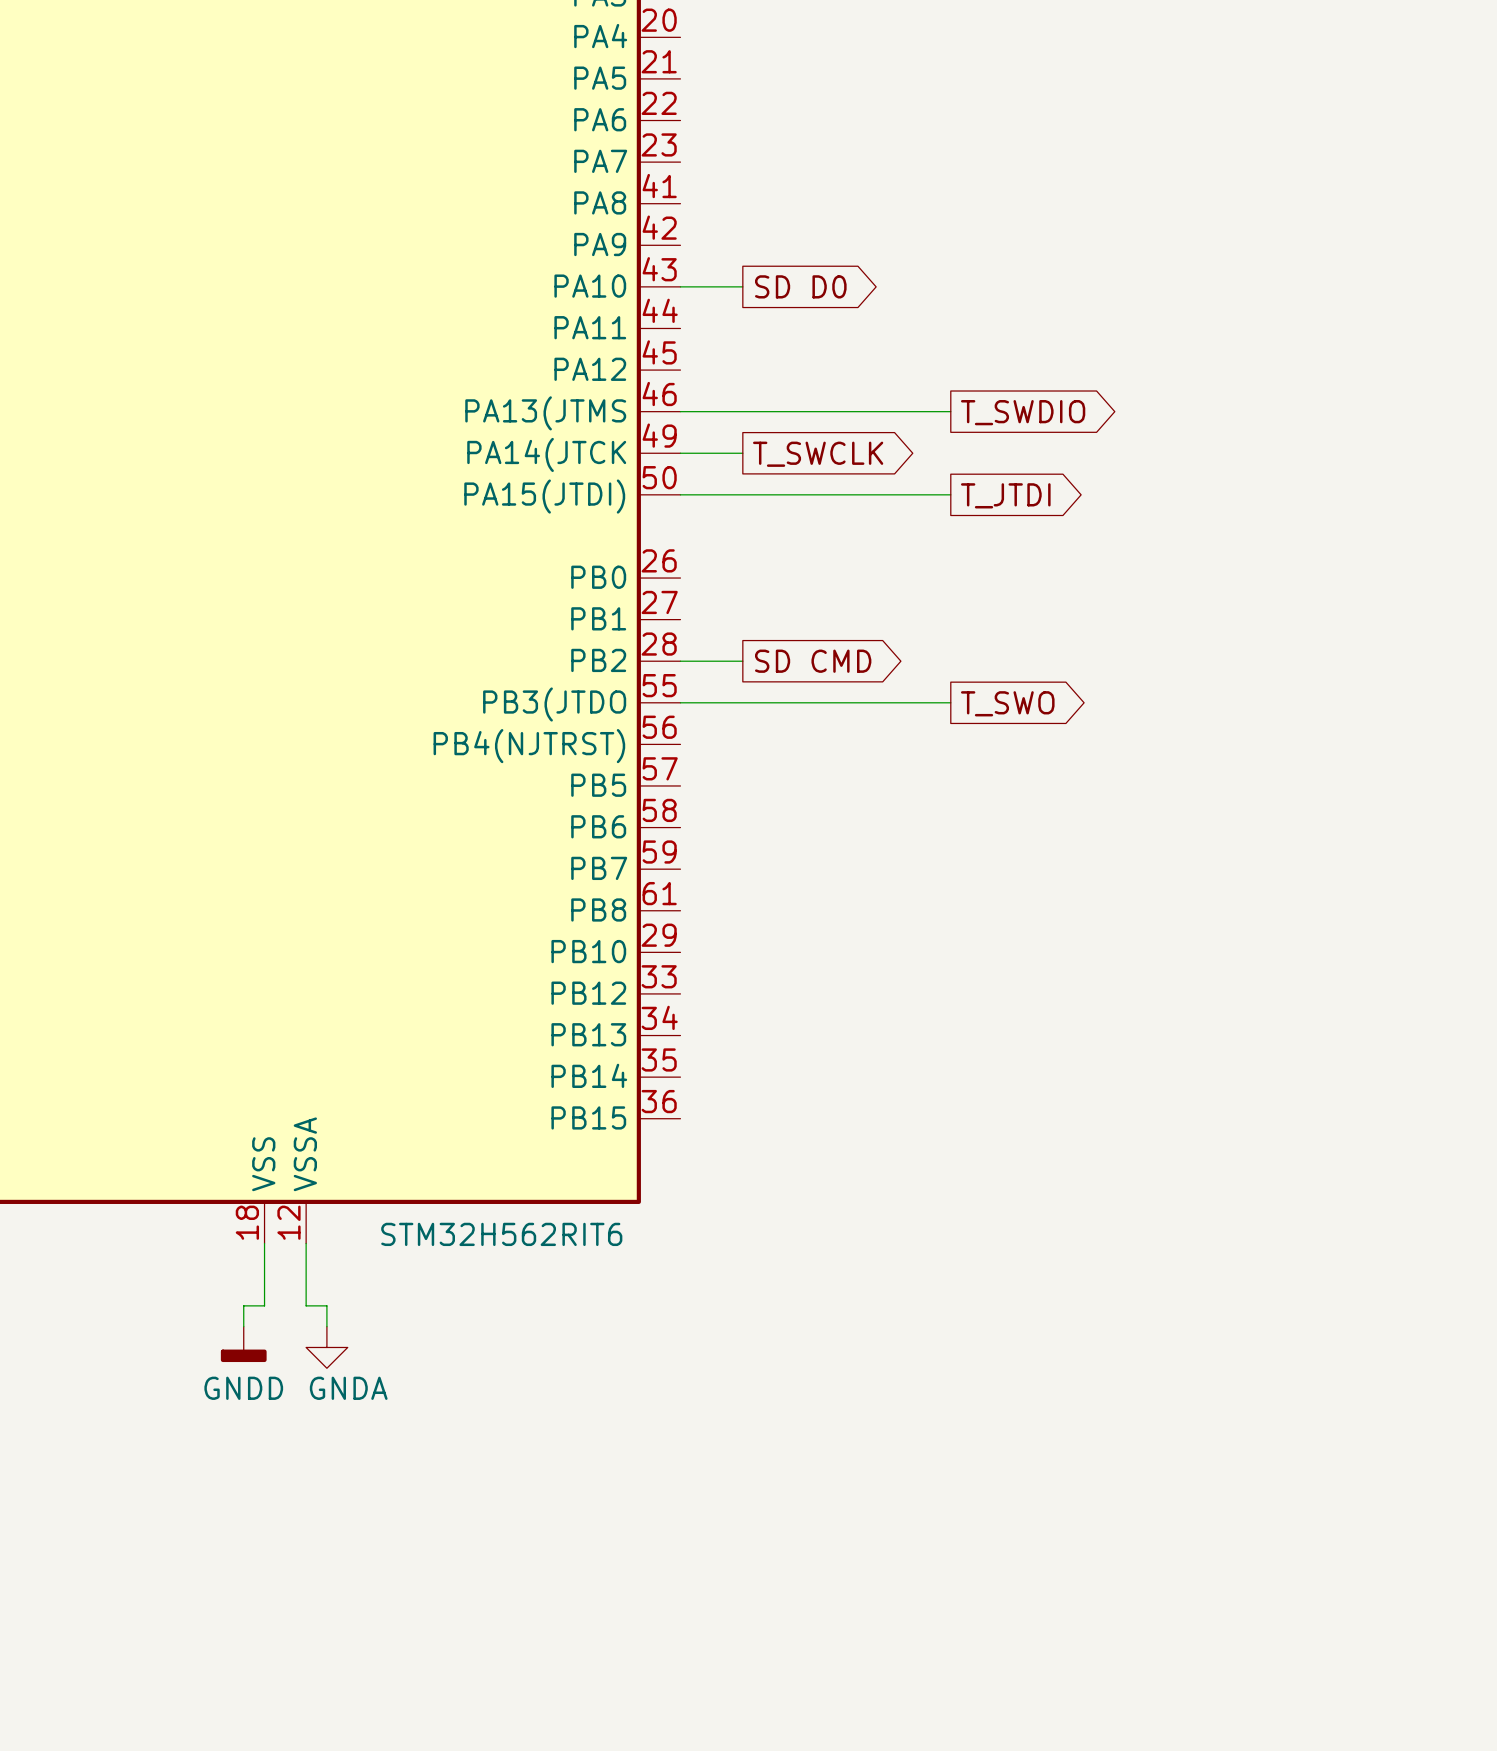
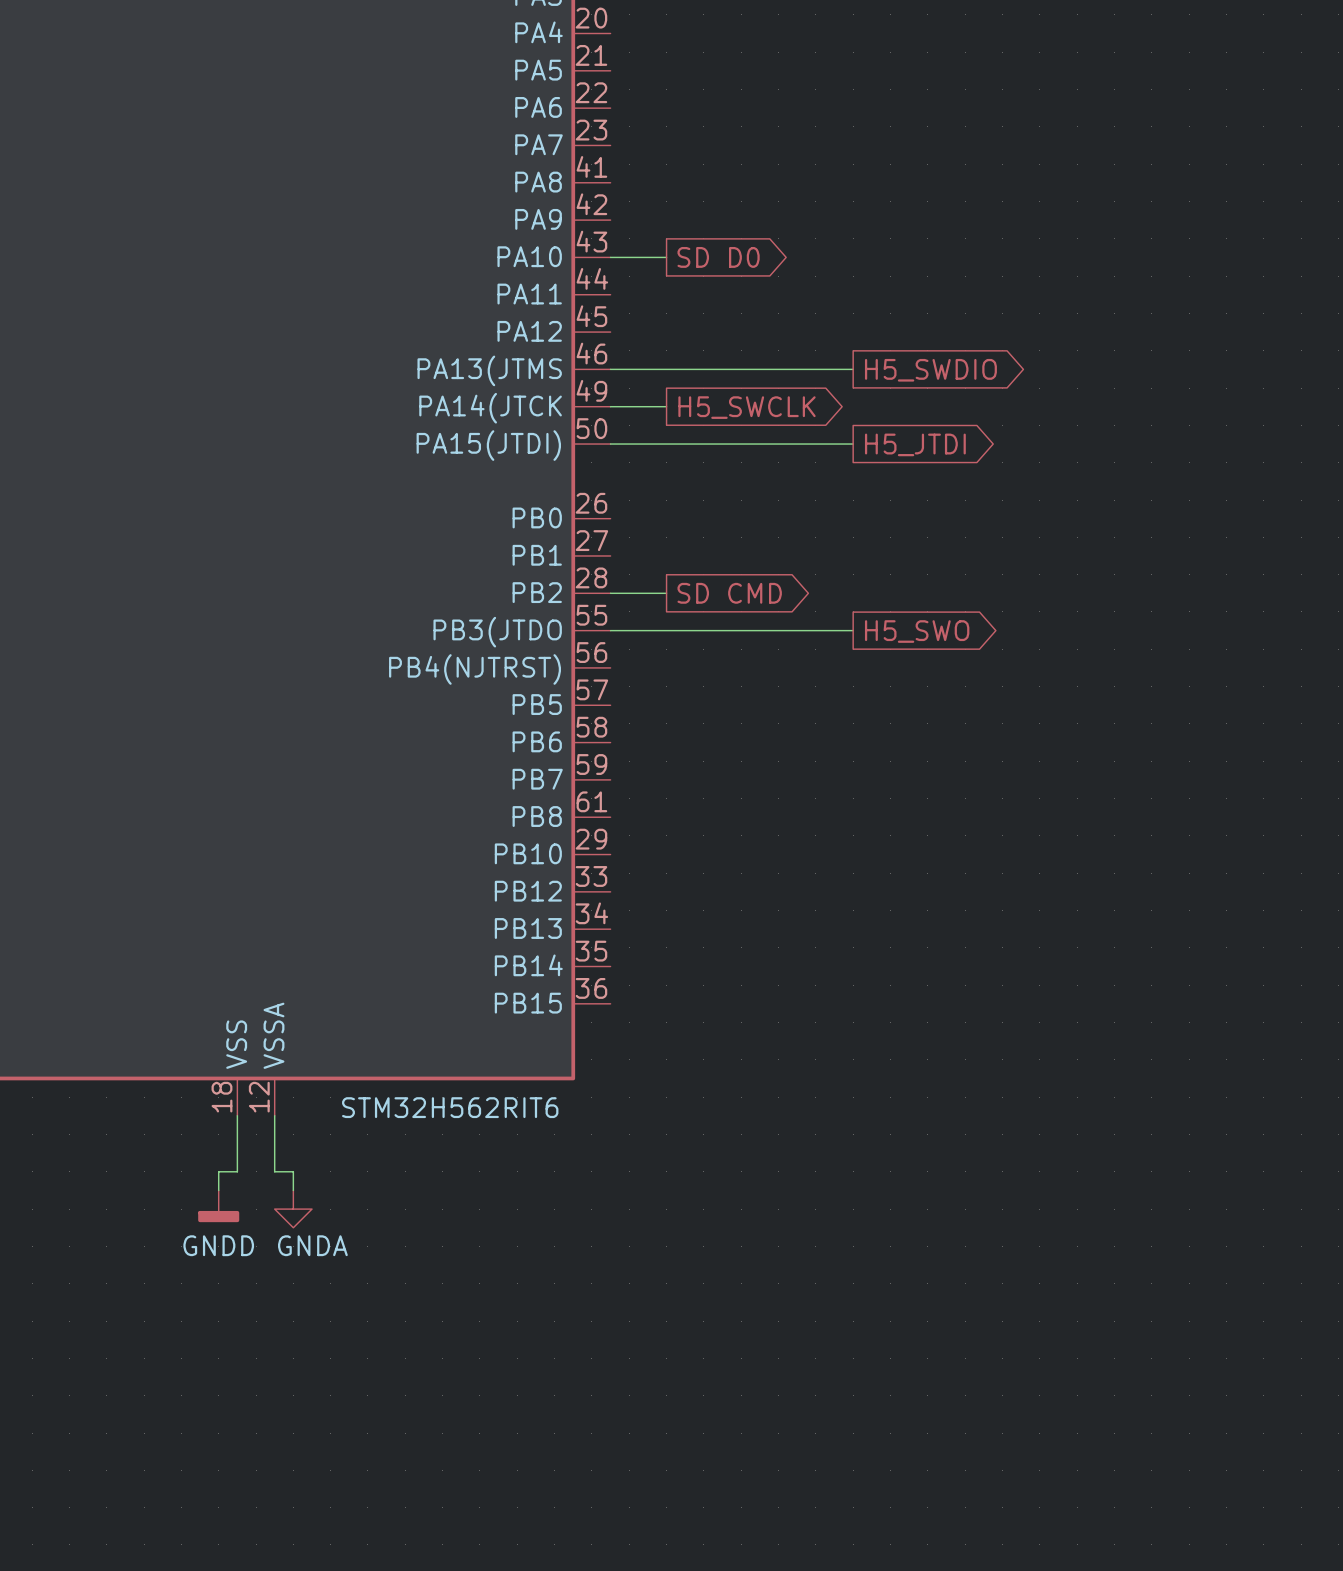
global label: T_SWDIO (1023, 412) -> H5_SWDIO (930, 370)
global label: T_SWCLK (818, 454) -> H5_SWCLK (747, 407)
global label: T_JTDI (1005, 495) -> H5_JTDI (915, 444)
global label: T_SWO (1007, 703) -> H5_SWO (917, 631)

